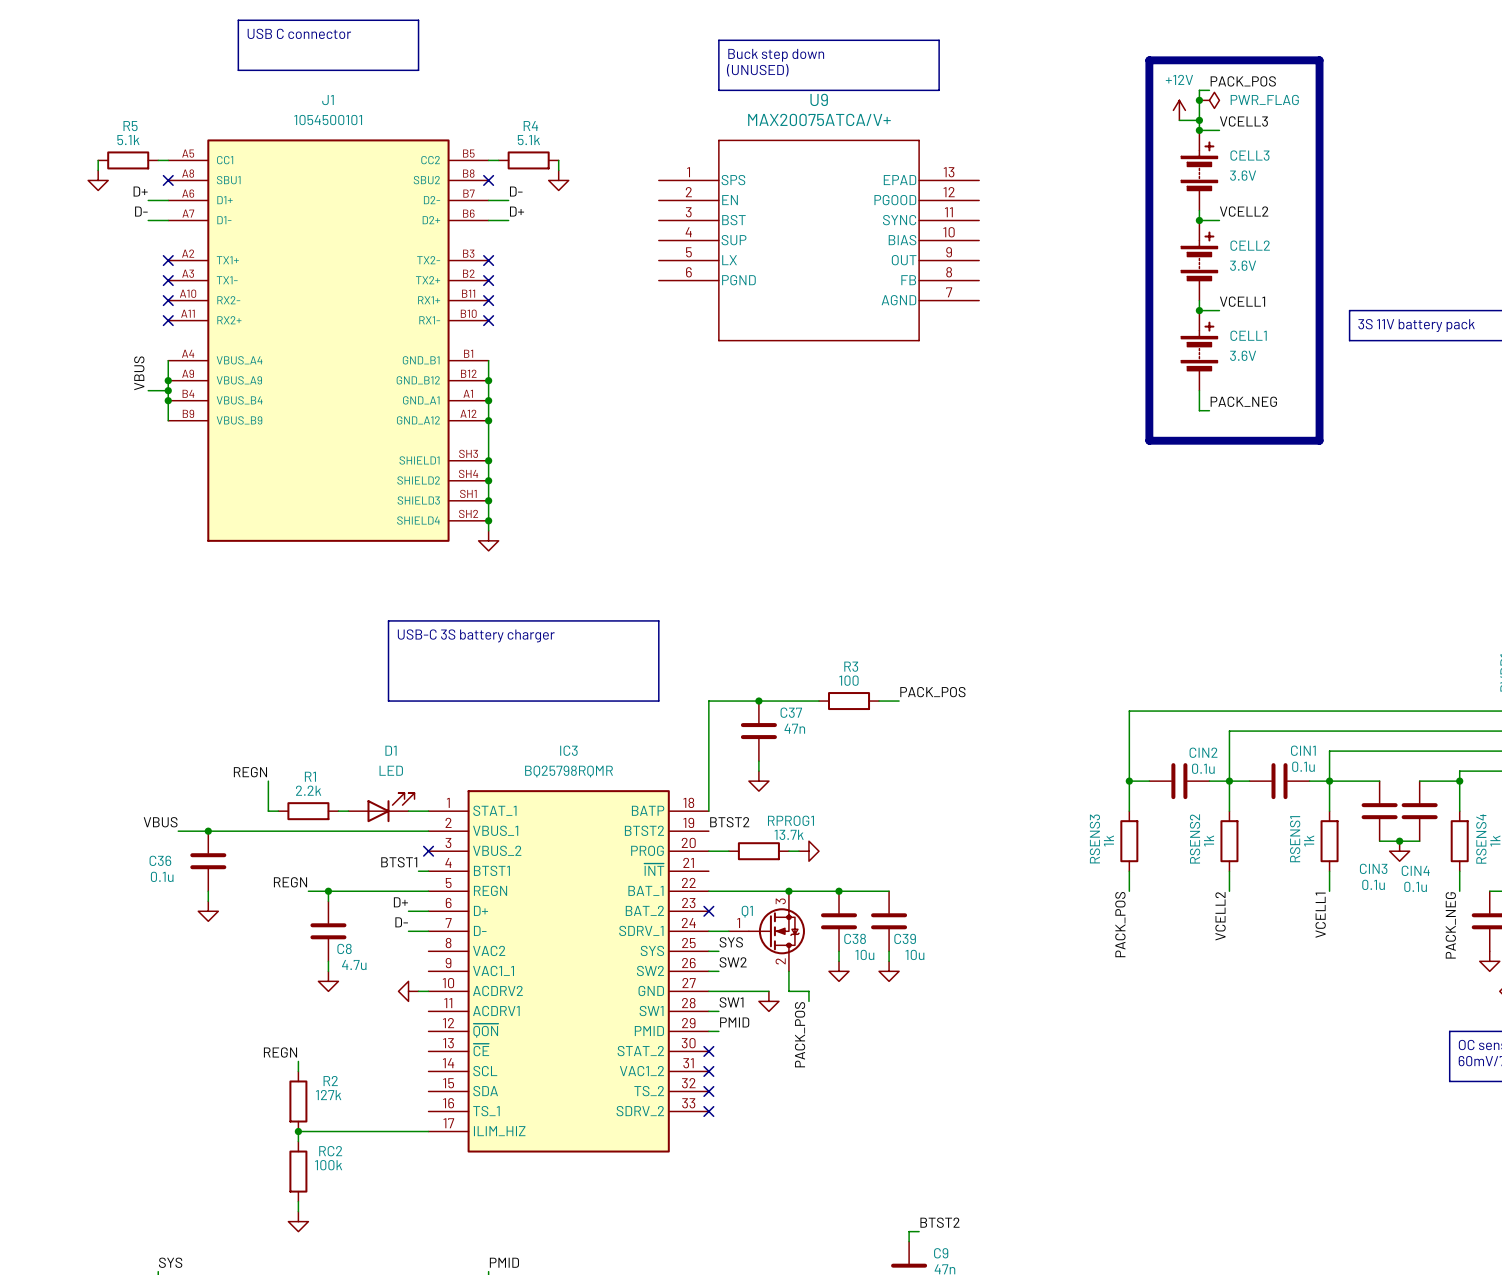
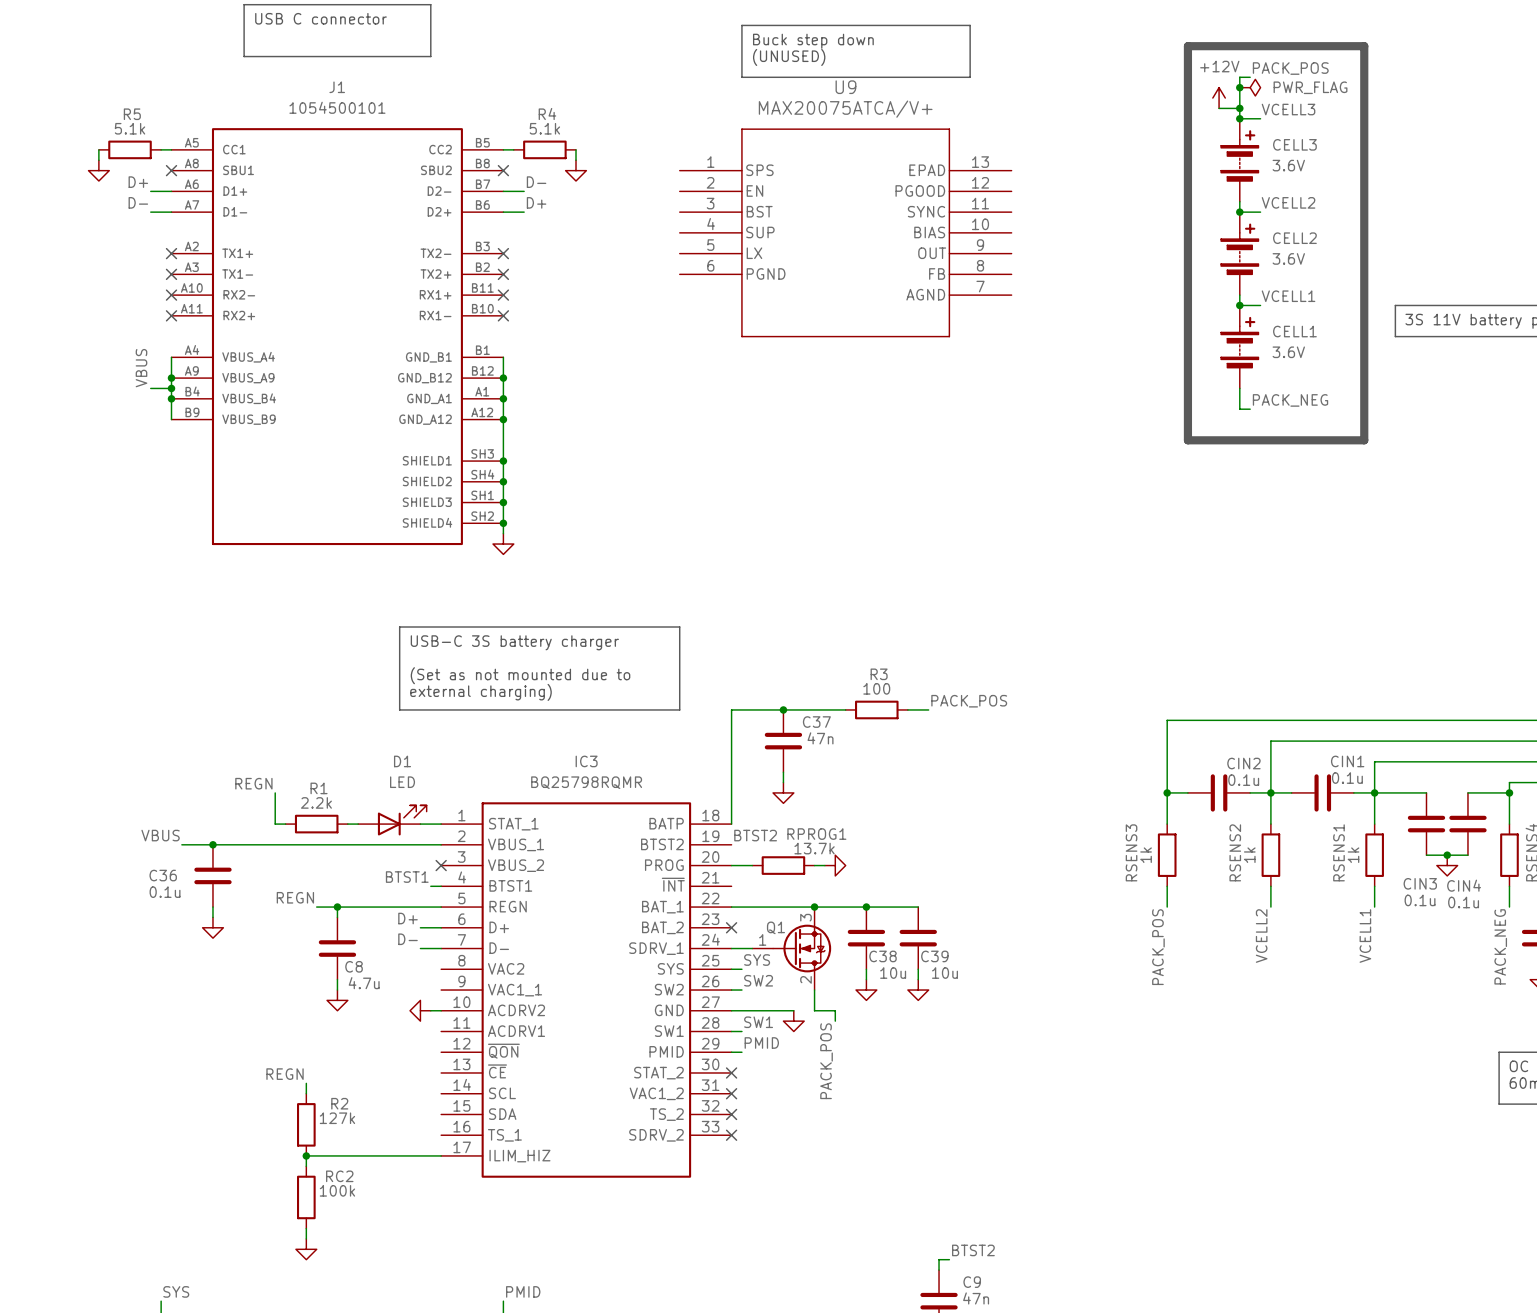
text: none -> (Set as not mounted due to (520, 675)
text: none -> external charging) (481, 692)

